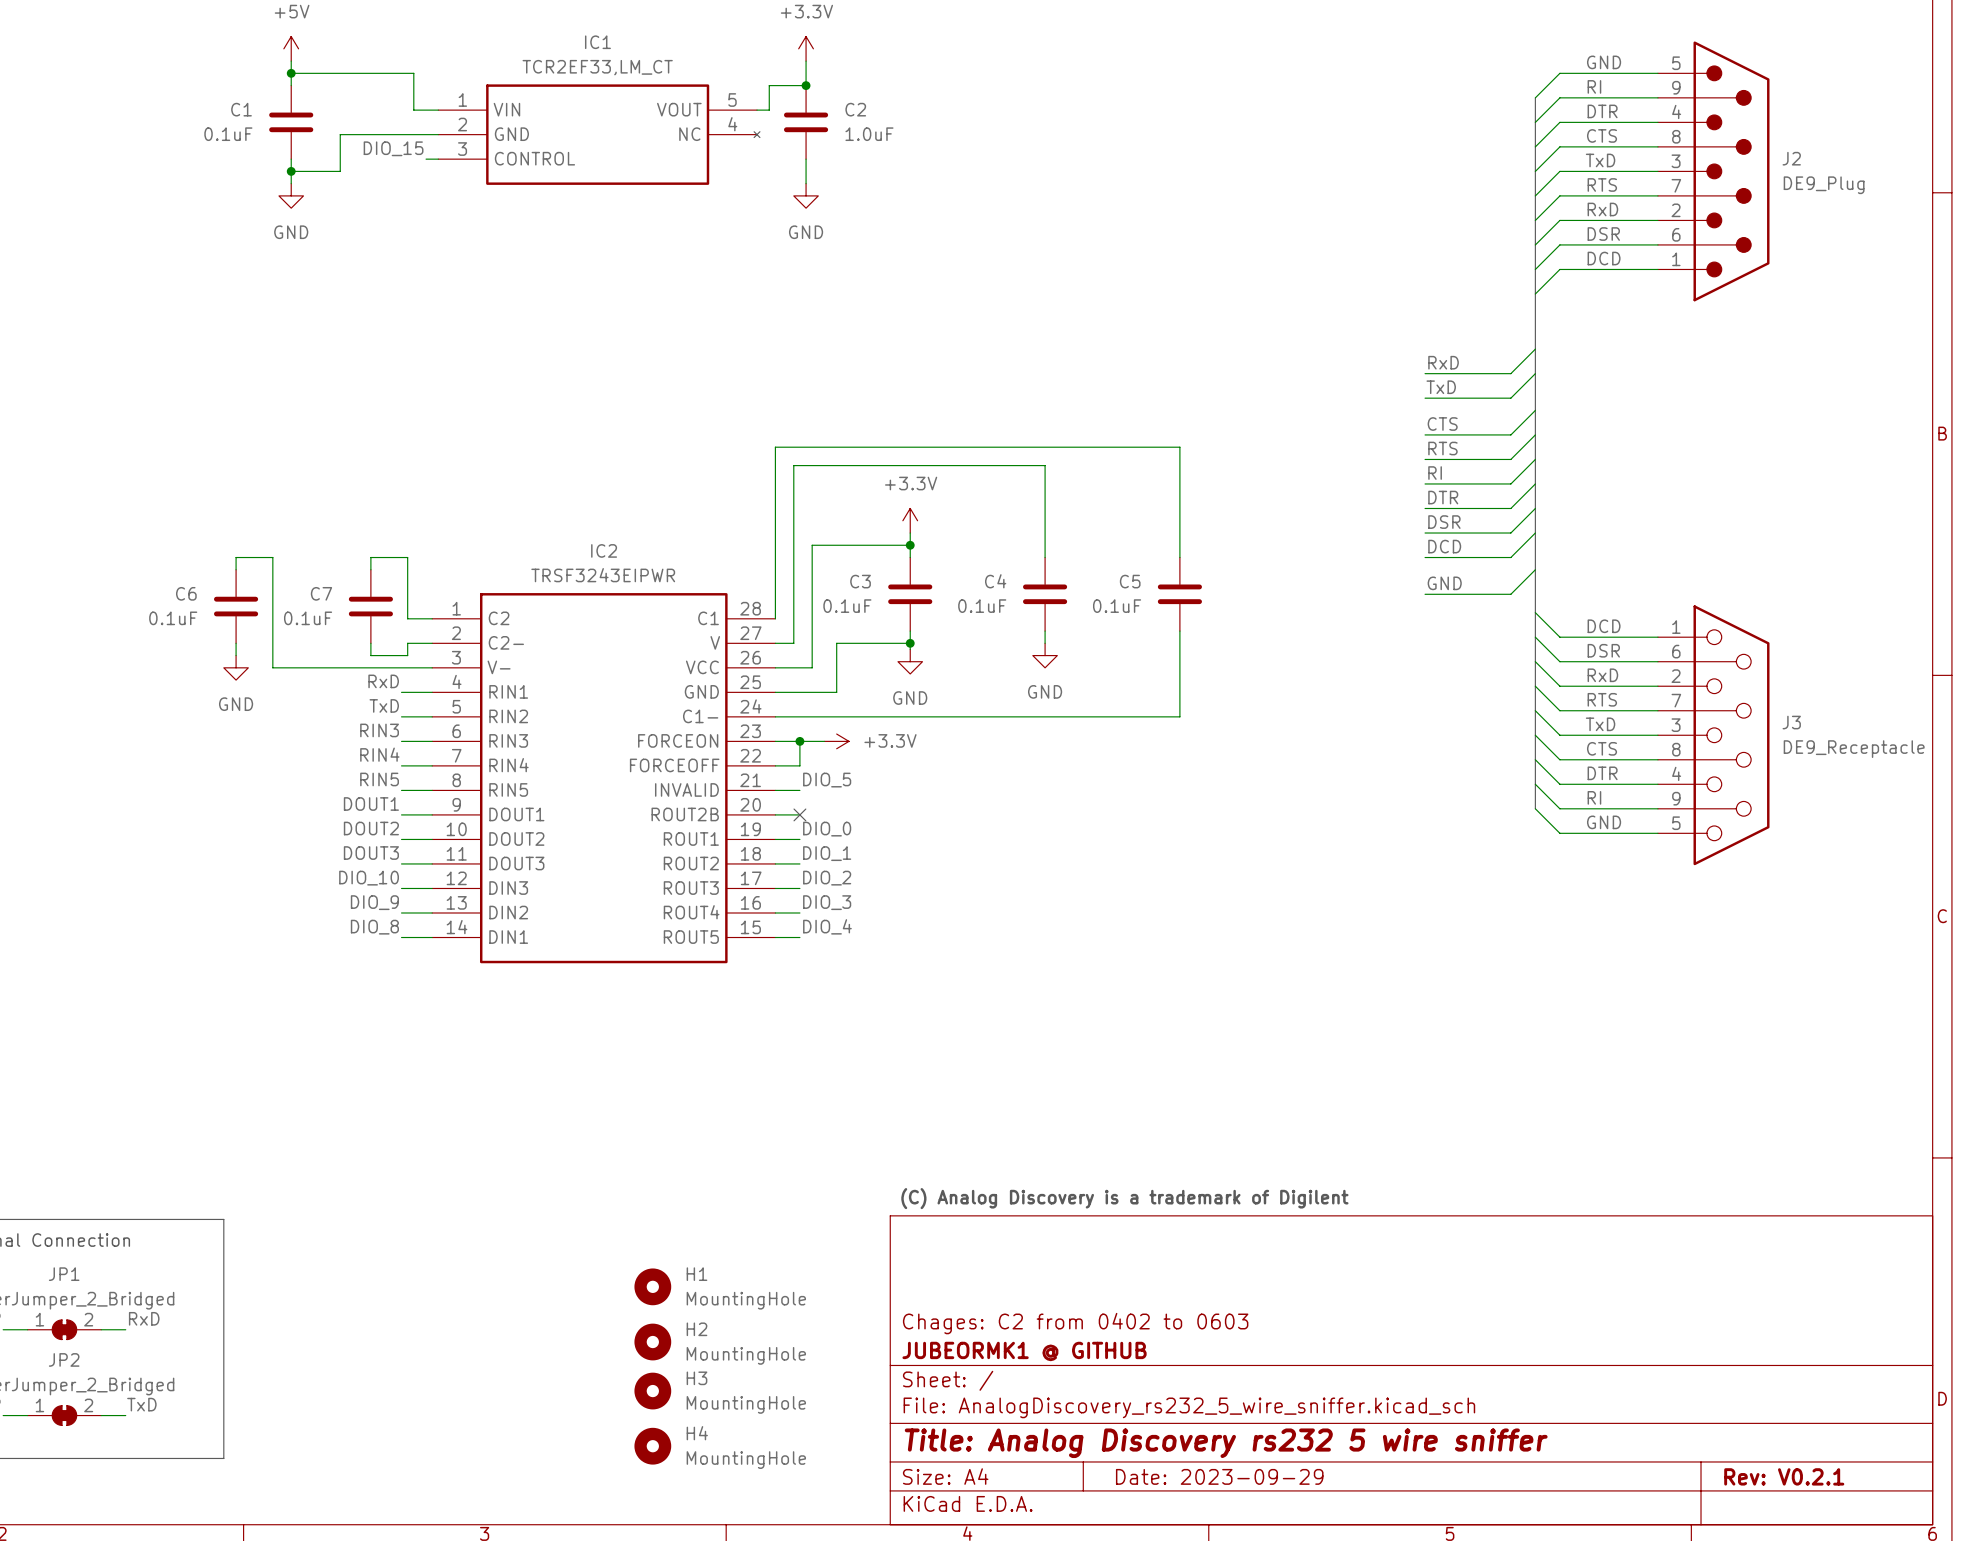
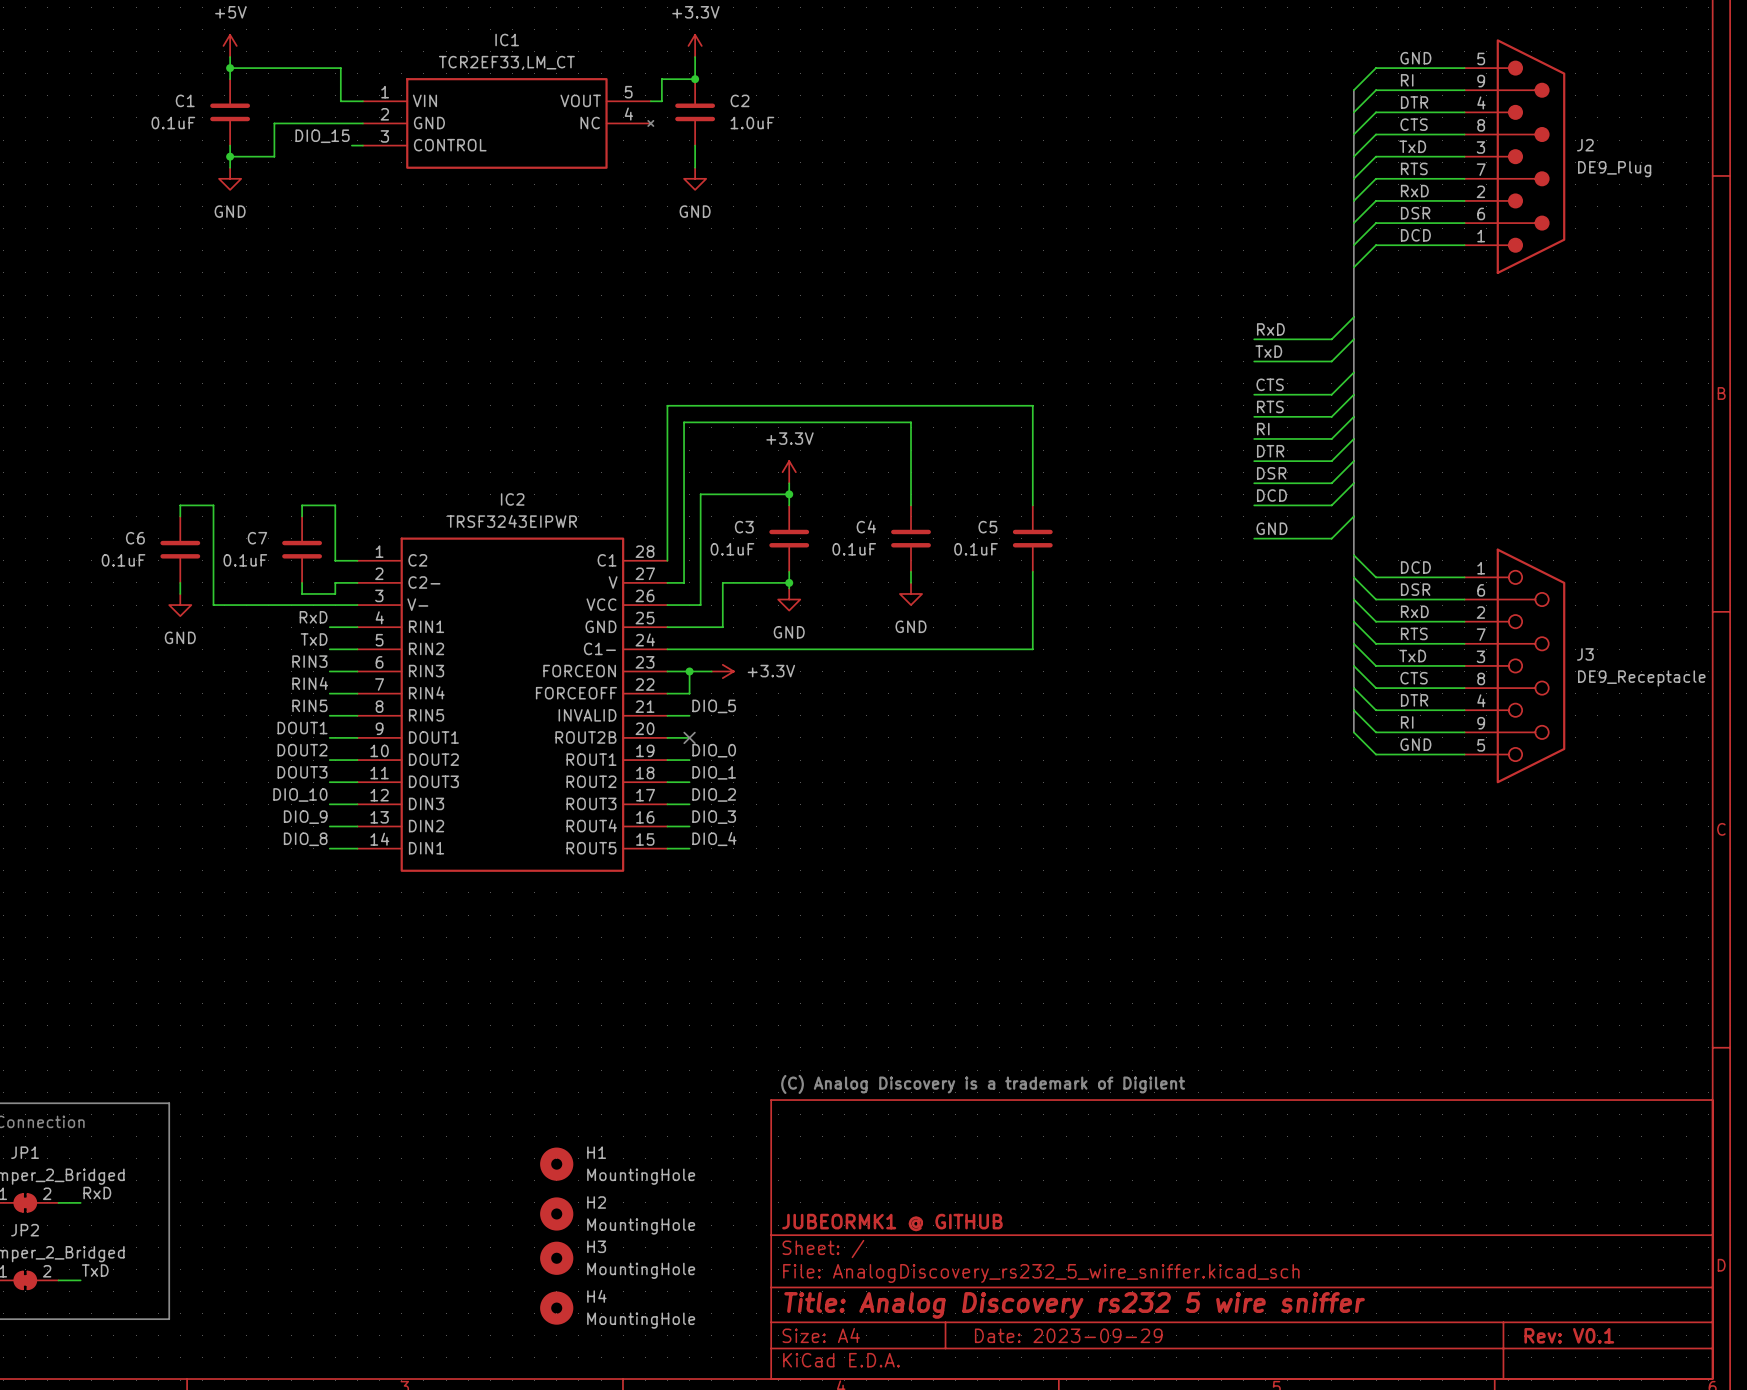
title block: Chages: C2 from 0402 to 0603 (1075, 1323) -> none
title block: Rev: V0.2.1 (1784, 1476) -> Rev: V0.1 (1569, 1335)

